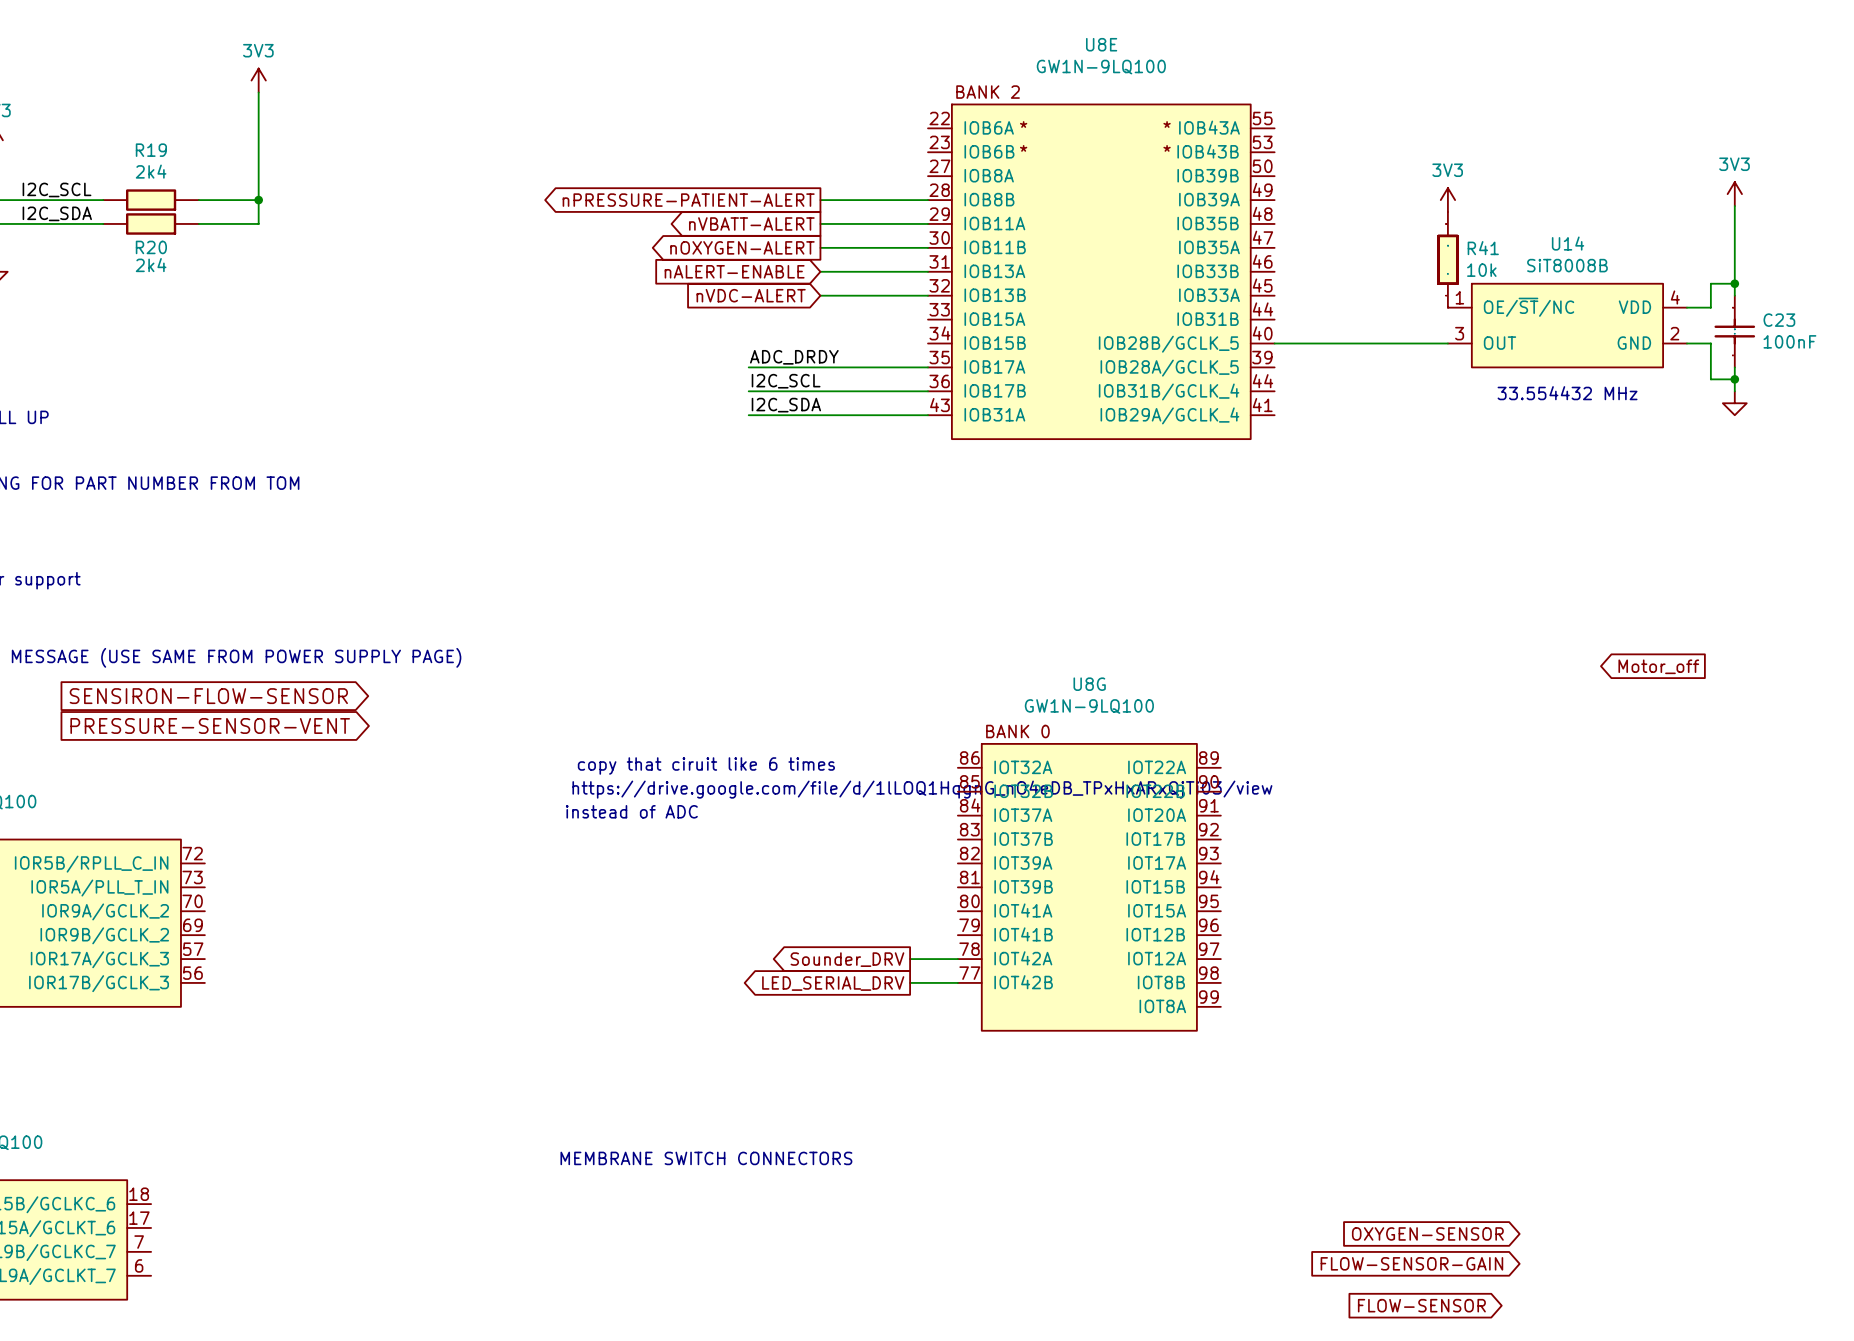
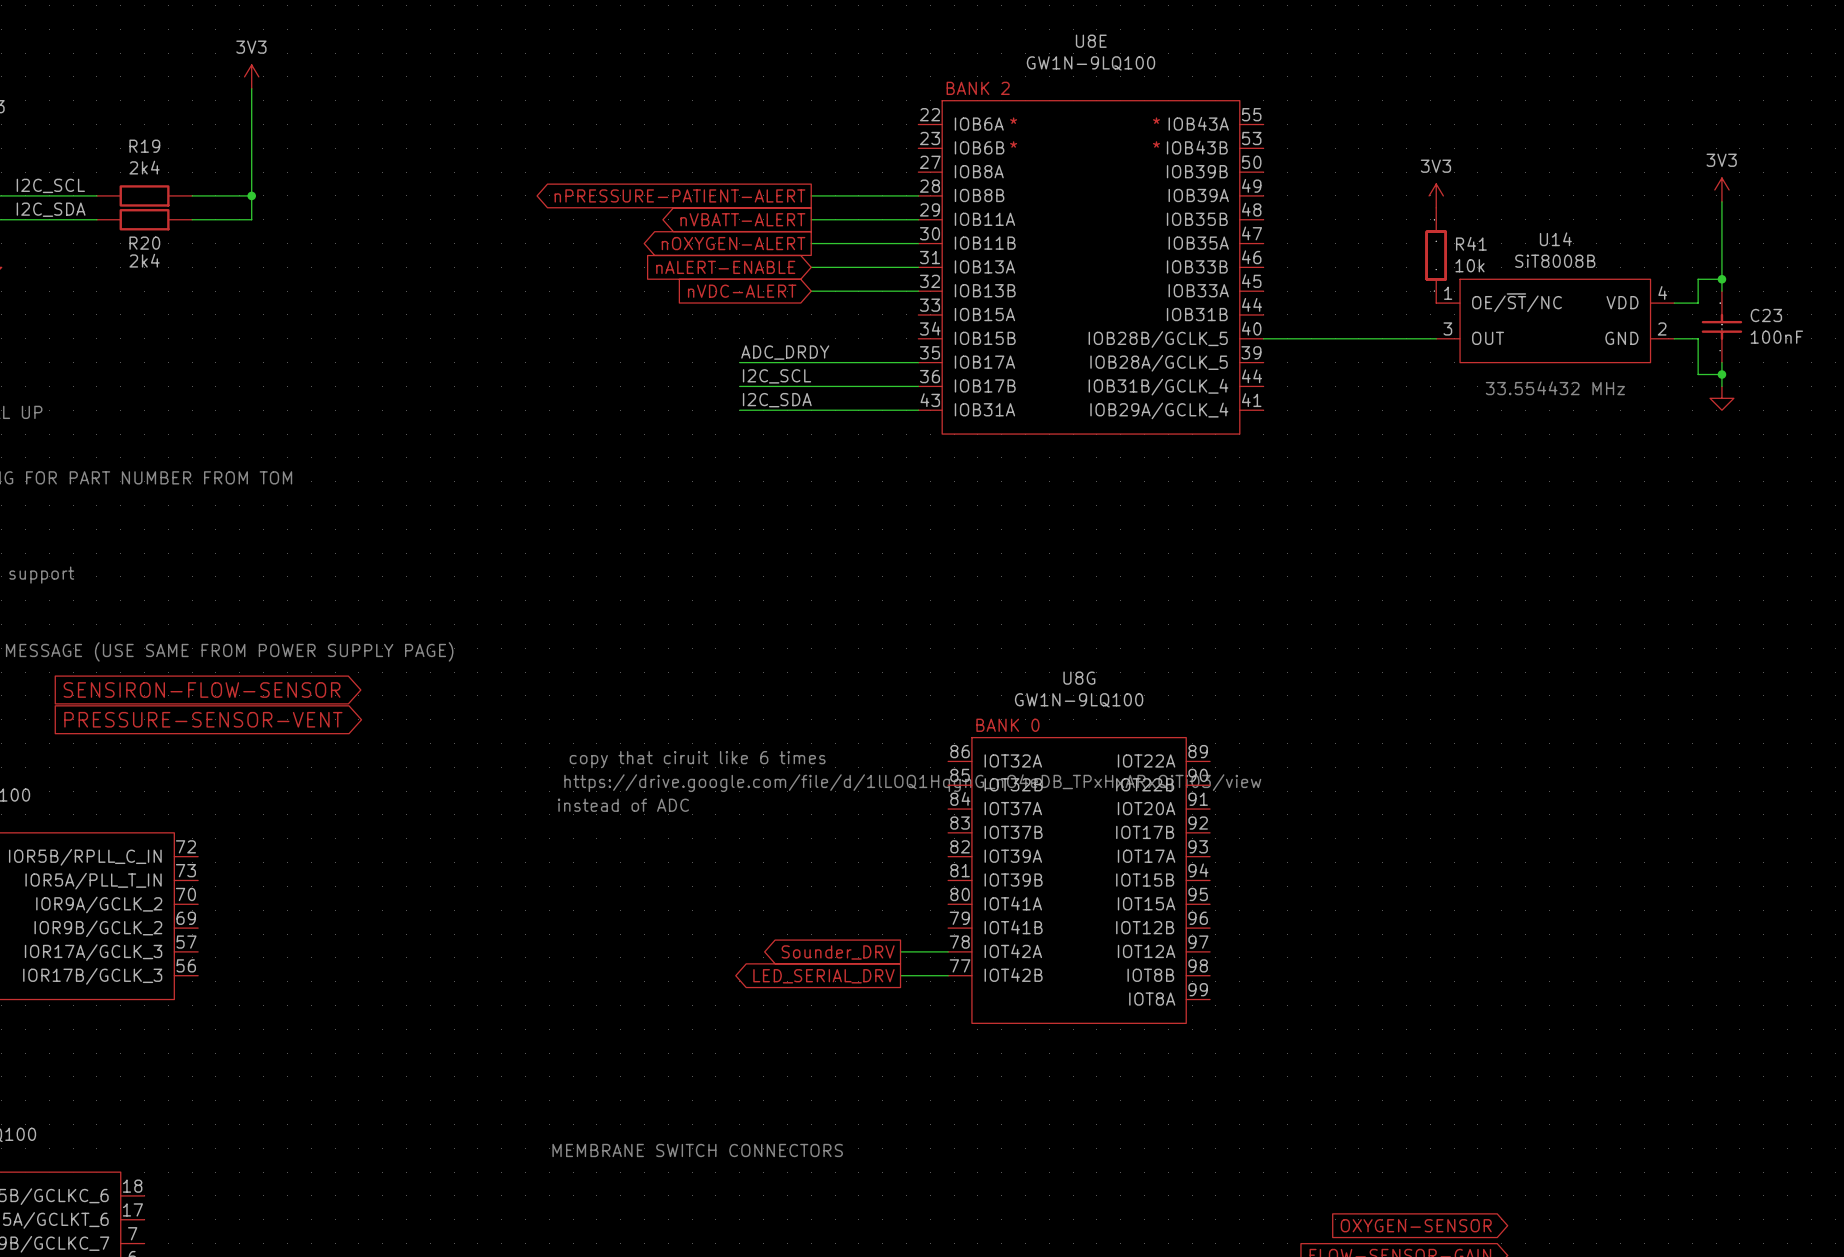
global label: Motor_off (1658, 666) -> none

